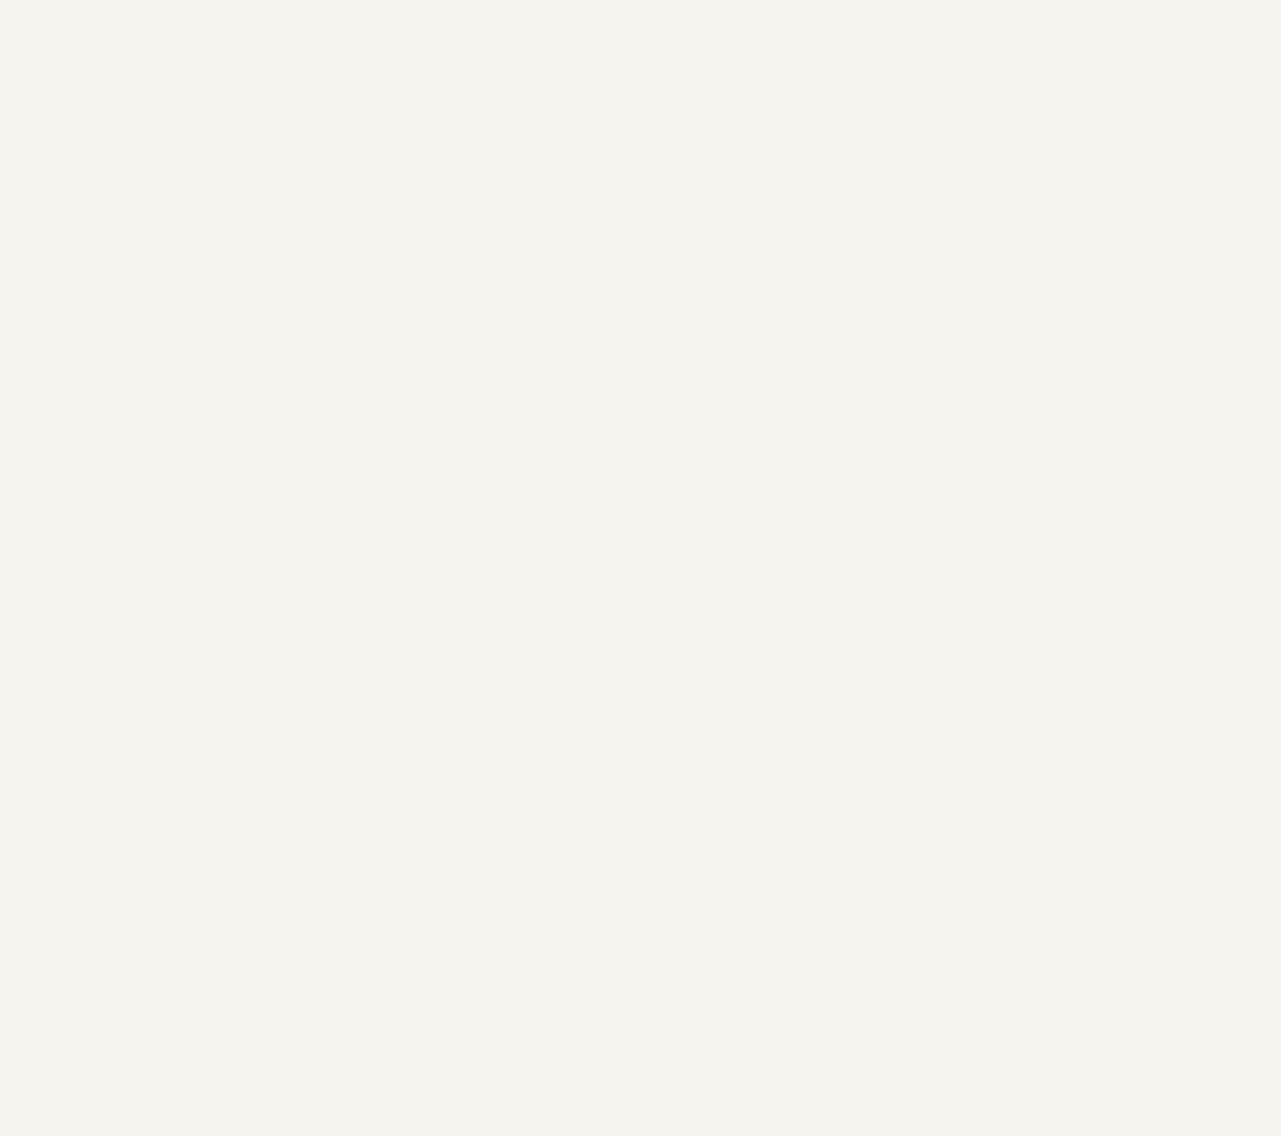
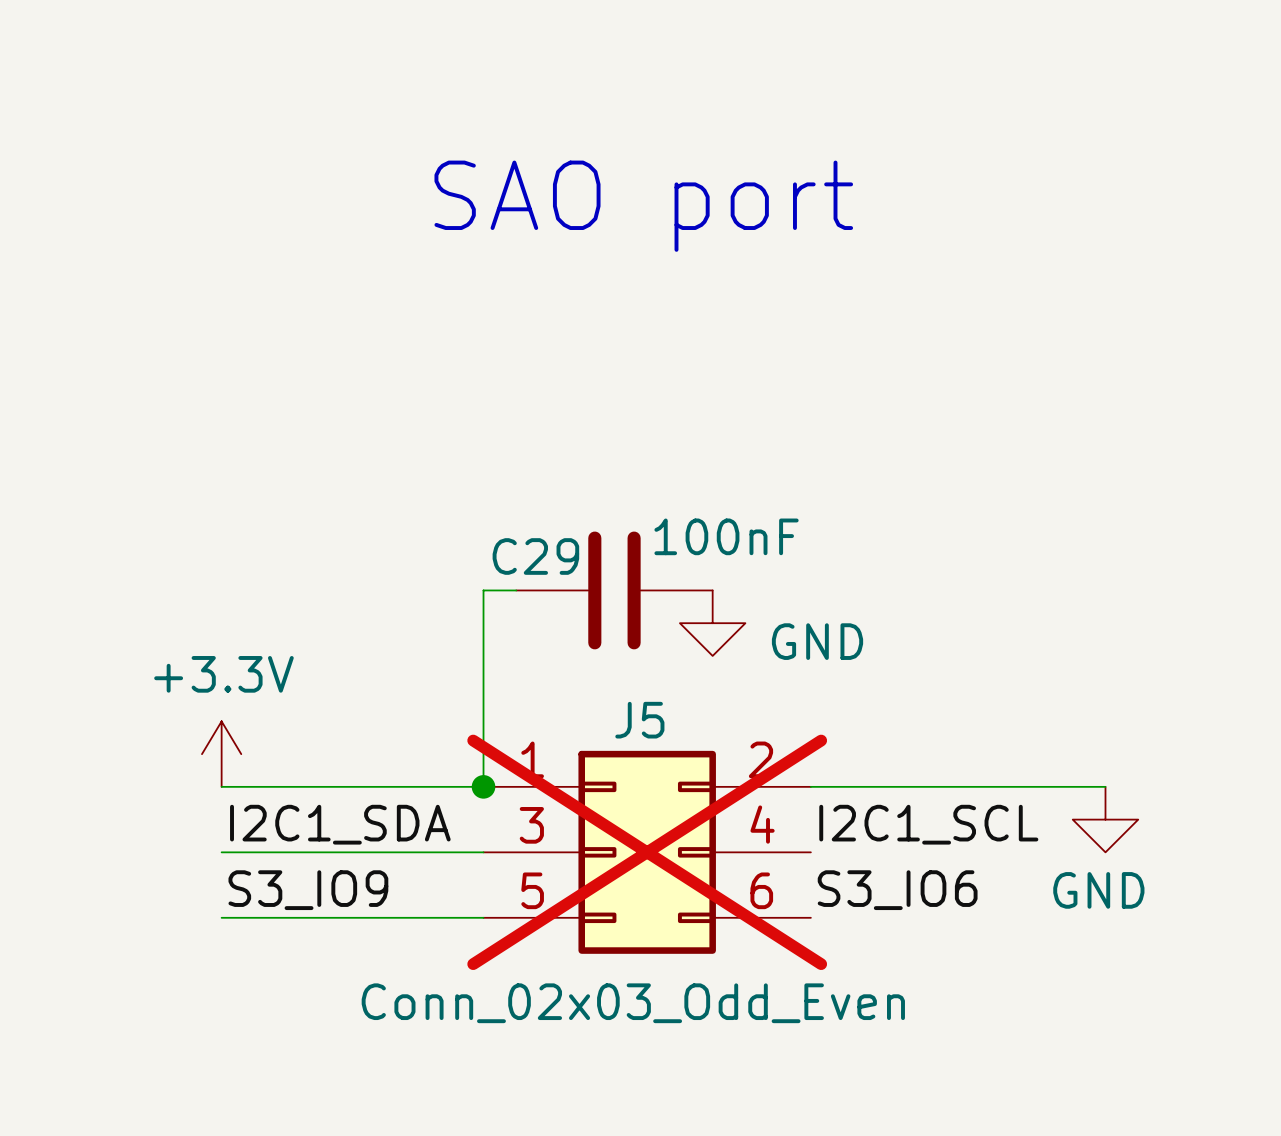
text: none -> SAO port (643, 206)
wire: none -> (516, 590) (483, 590) (483, 786) (221, 786)
C29: none -> 100nF (614, 590)
power symbol: none -> GND (712, 623)
power symbol: none -> +3.3V (221, 754)
junction: none -> (483, 786)
wire: none -> (810, 786) (1105, 786)
power symbol: none -> GND (1105, 819)
label: none -> I2C1_SDA (340, 824)
label: none -> I2C1_SCL (928, 824)
wire: none -> (221, 852) (483, 852)
J5: none -> Conn_02x03_Odd_Even (647, 852)
label: none -> S3_IO9 (308, 890)
label: none -> S3_IO6 (897, 890)
wire: none -> (221, 917) (483, 917)

